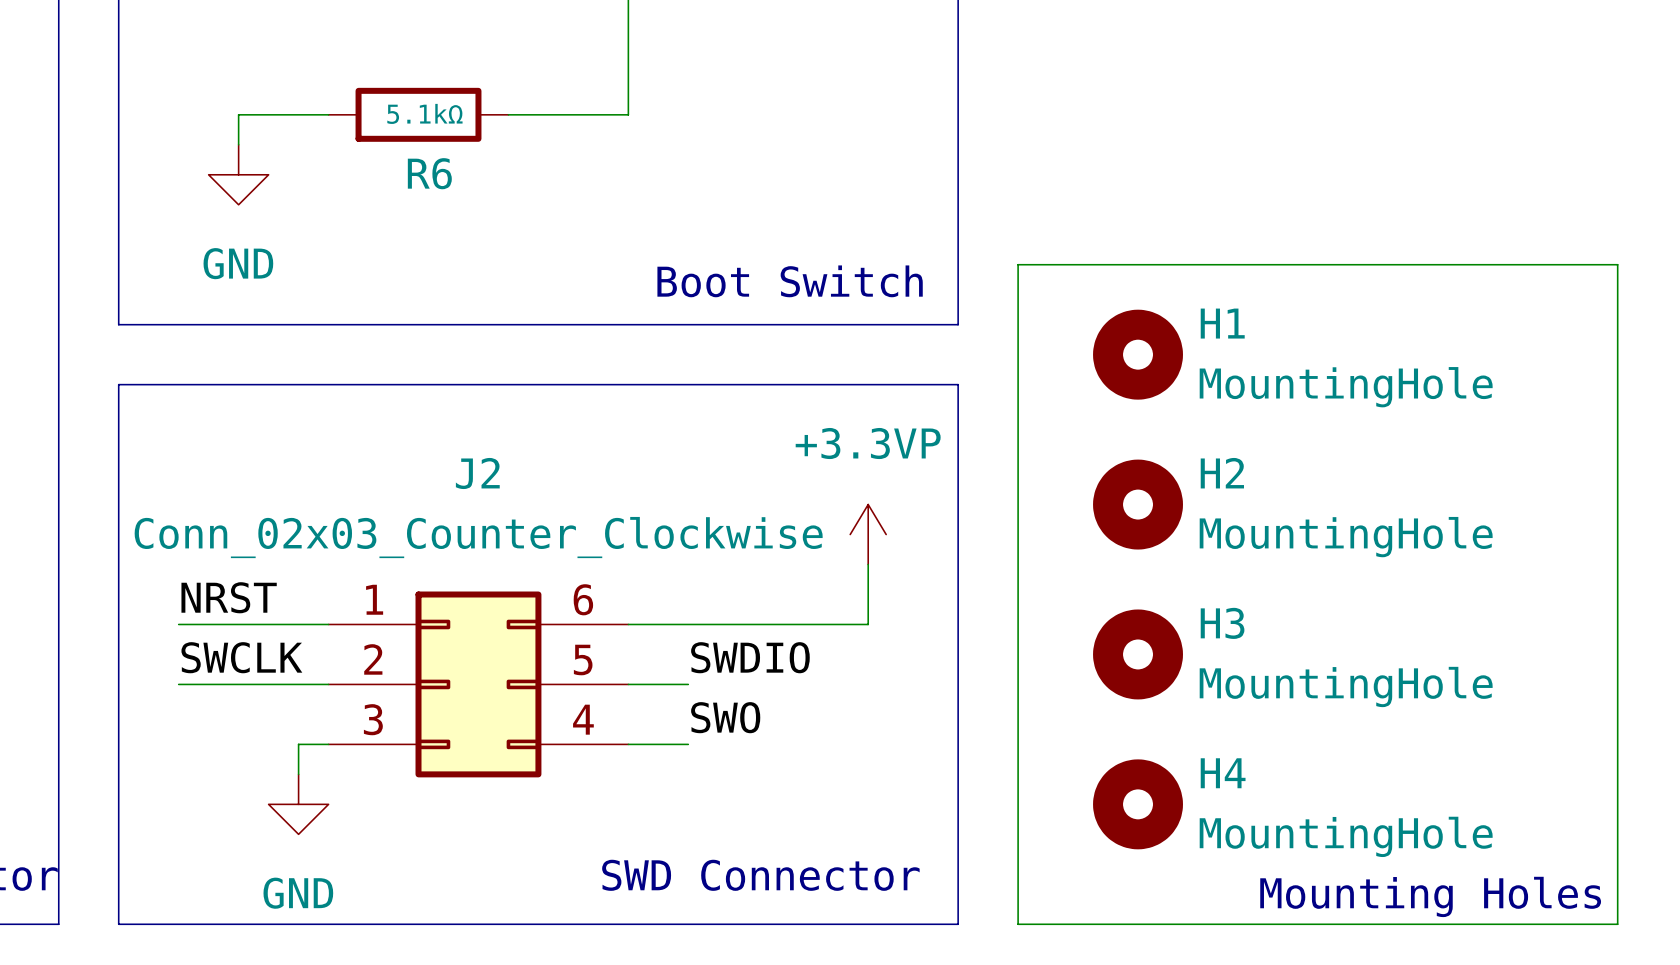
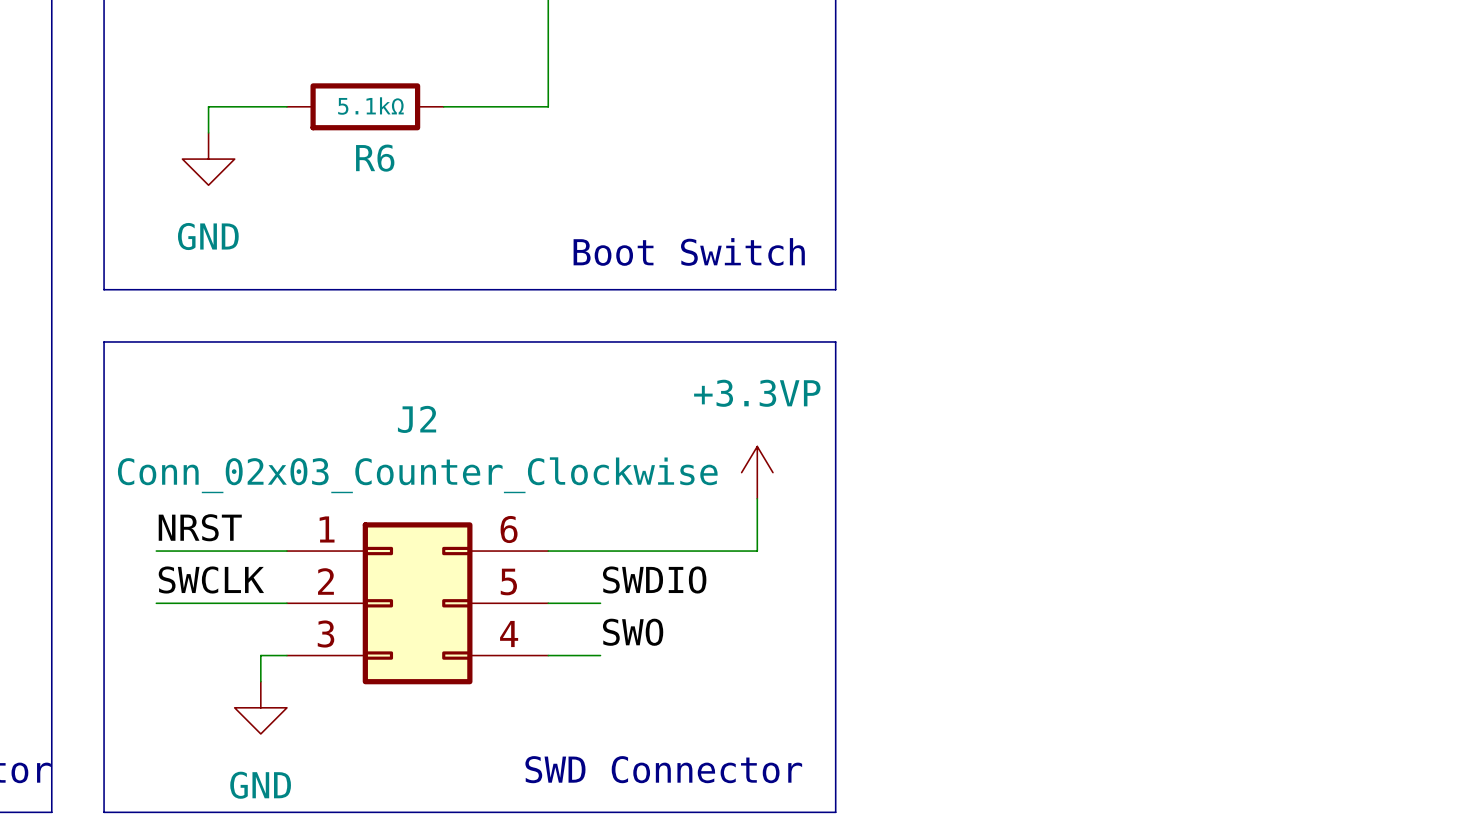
wire: (1018, 264) (1617, 264) (1617, 924) (1018, 924) (1018, 264) -> none
H1: MountingHole (1138, 354) -> none
H2: MountingHole (1138, 504) -> none
H3: MountingHole (1138, 654) -> none
H4: MountingHole (1138, 804) -> none
text: Mounting Holes (1430, 896) -> none

